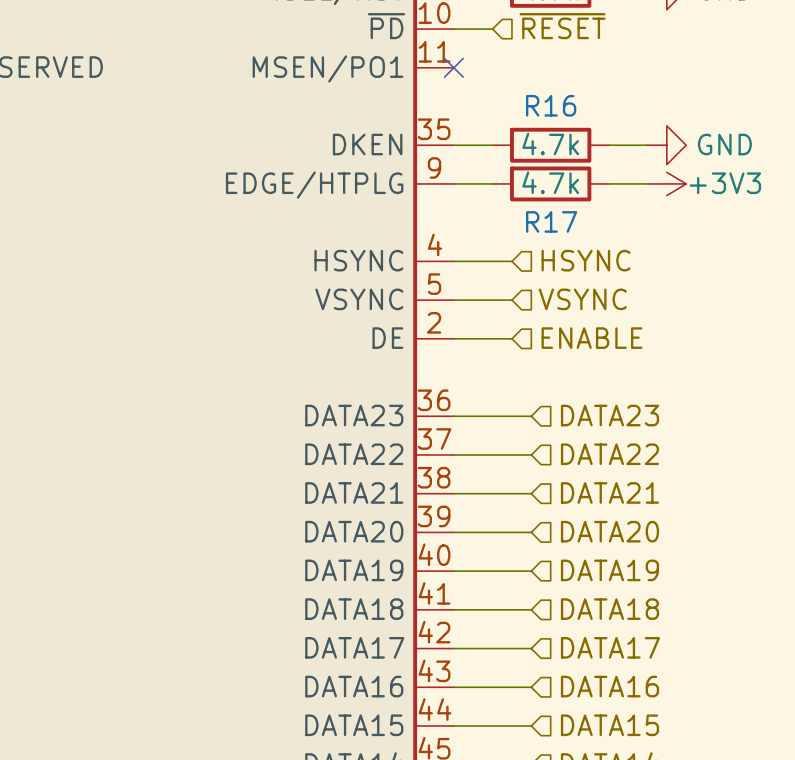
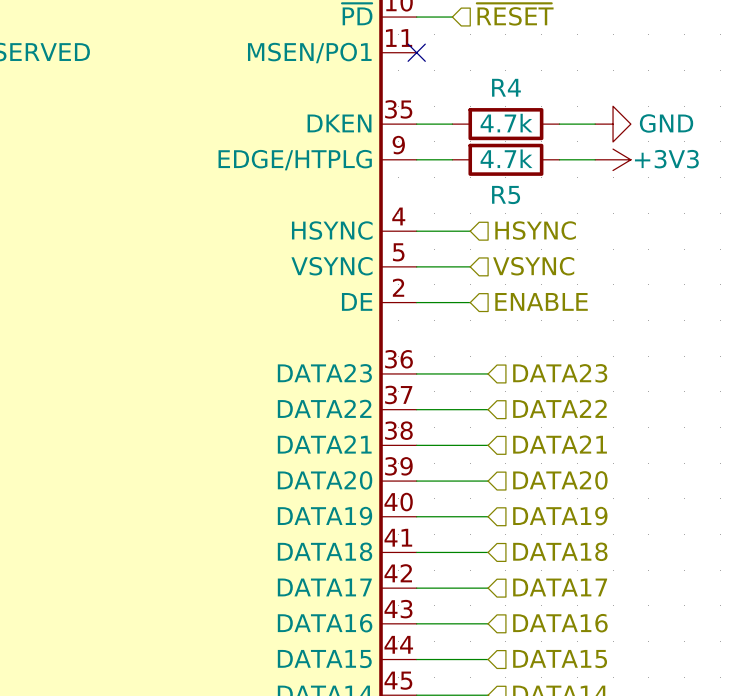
R16 name: R16 (551, 105) -> R4 (506, 87)
R17 name: R17 (551, 221) -> R5 (506, 195)

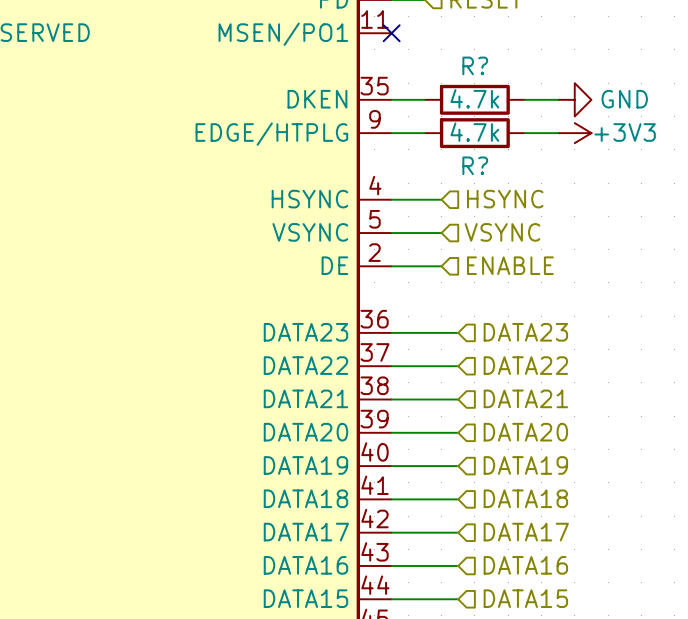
R4 name: R4 (506, 87) -> R? (475, 65)
R5 name: R5 (506, 195) -> R? (475, 165)

